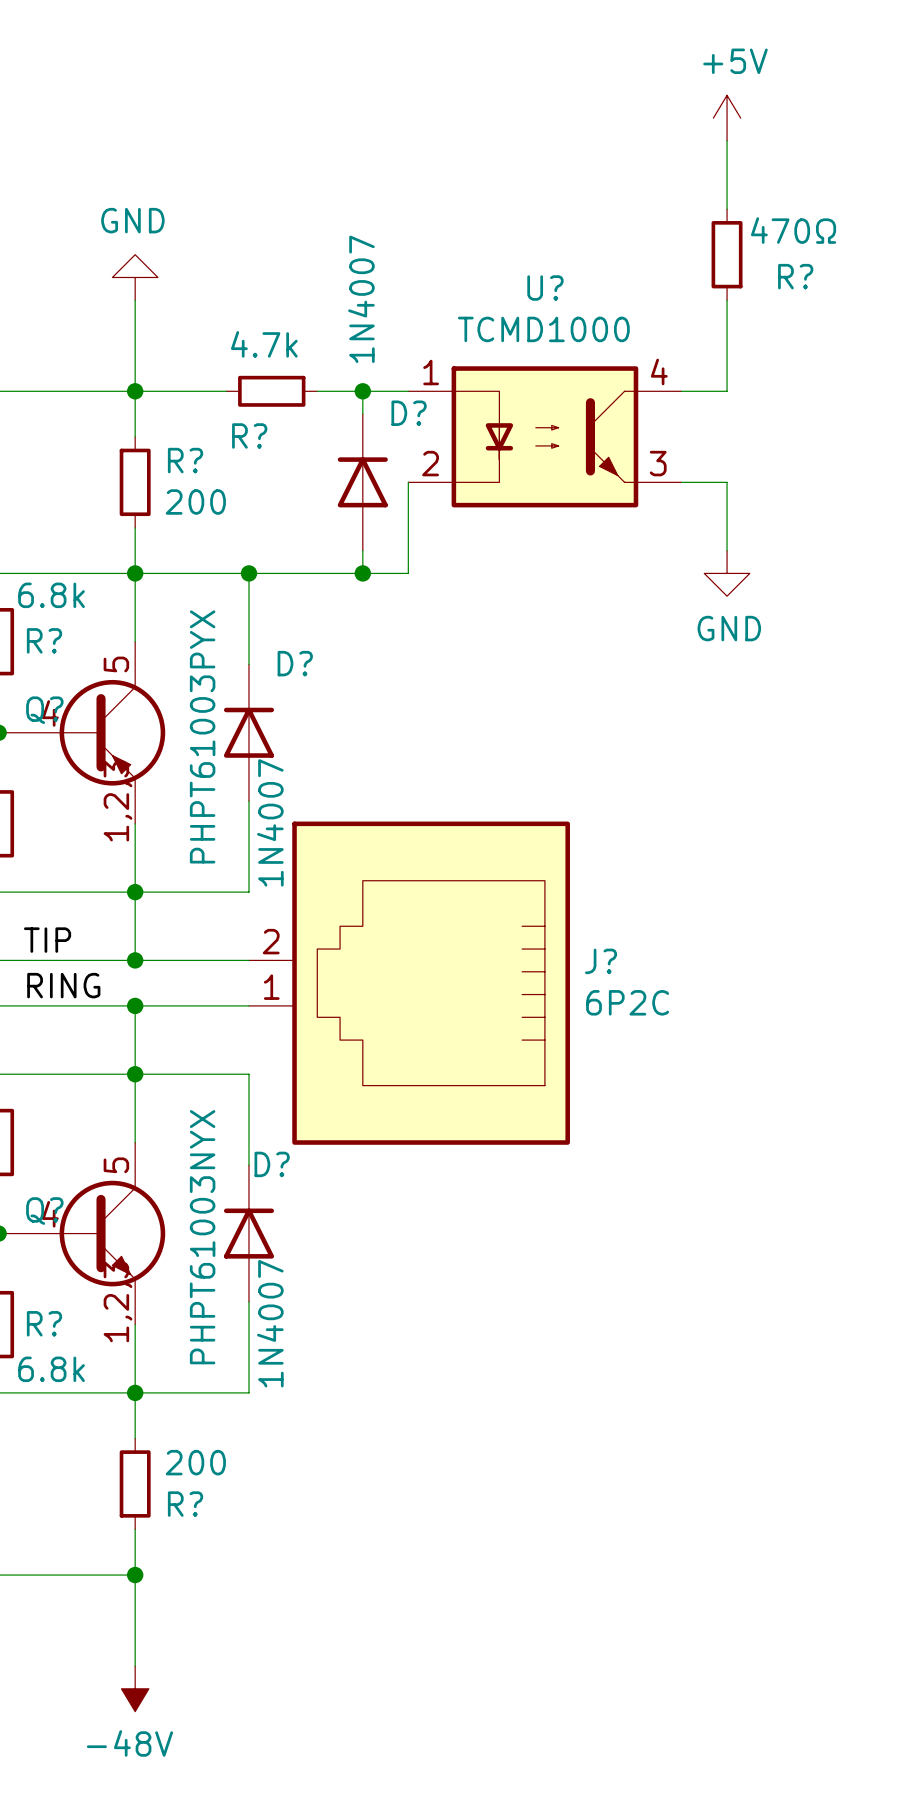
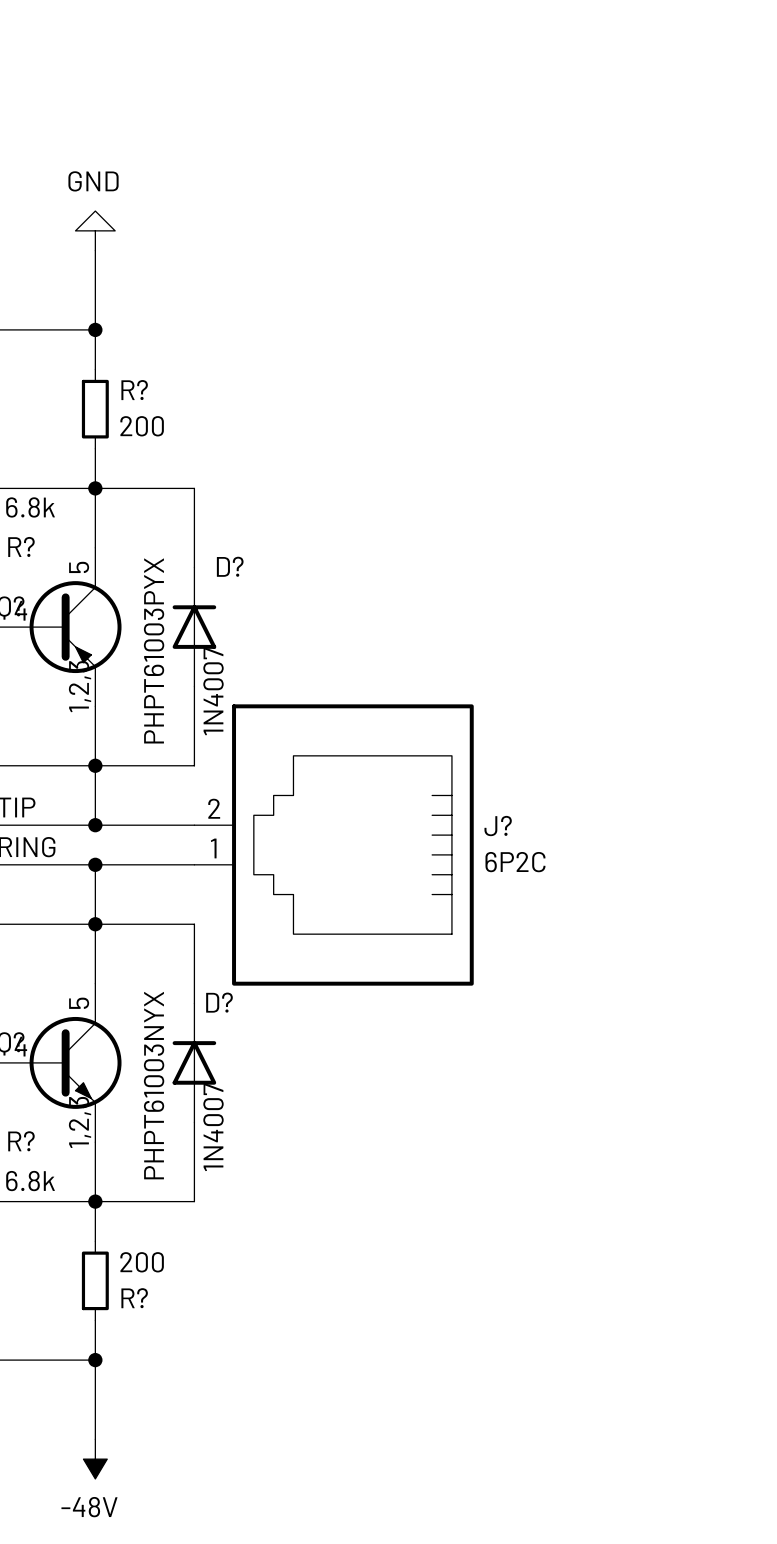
power symbol: +5V (727, 118) -> none
wire: (727, 140) (727, 209) -> none
R?: 470Ω (727, 254) -> none
wire: (727, 300) (727, 391) (681, 391) -> none
wire: (135, 391) (226, 391) -> none
R?: 4.7k (271, 391) -> none
wire: (317, 391) (408, 391) -> none
wire: (362, 391) (362, 414) -> none
junction: (362, 391) -> none
U?: TCMD1000 (544, 436) -> none
D?: 1N4007 (362, 482) -> none
wire: (408, 482) (408, 573) (248, 573) -> none
wire: (681, 482) (727, 482) (727, 550) -> none
wire: (362, 550) (362, 573) -> none
junction: (248, 573) -> none
junction: (362, 573) -> none
power symbol: GND (727, 573) -> none

